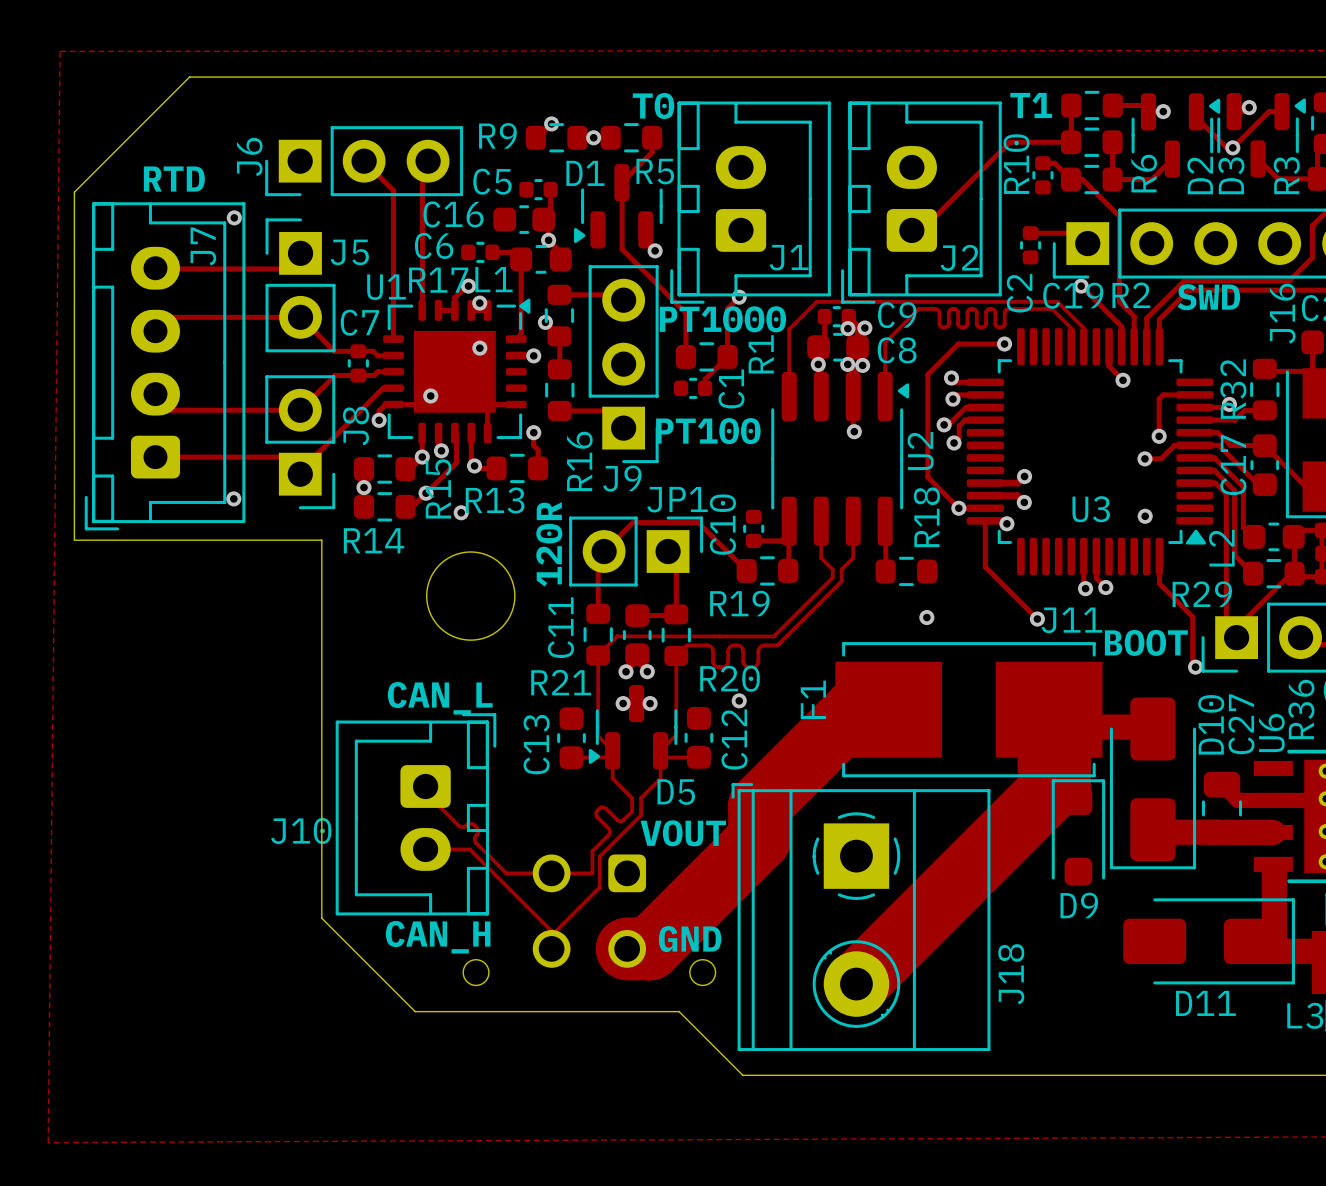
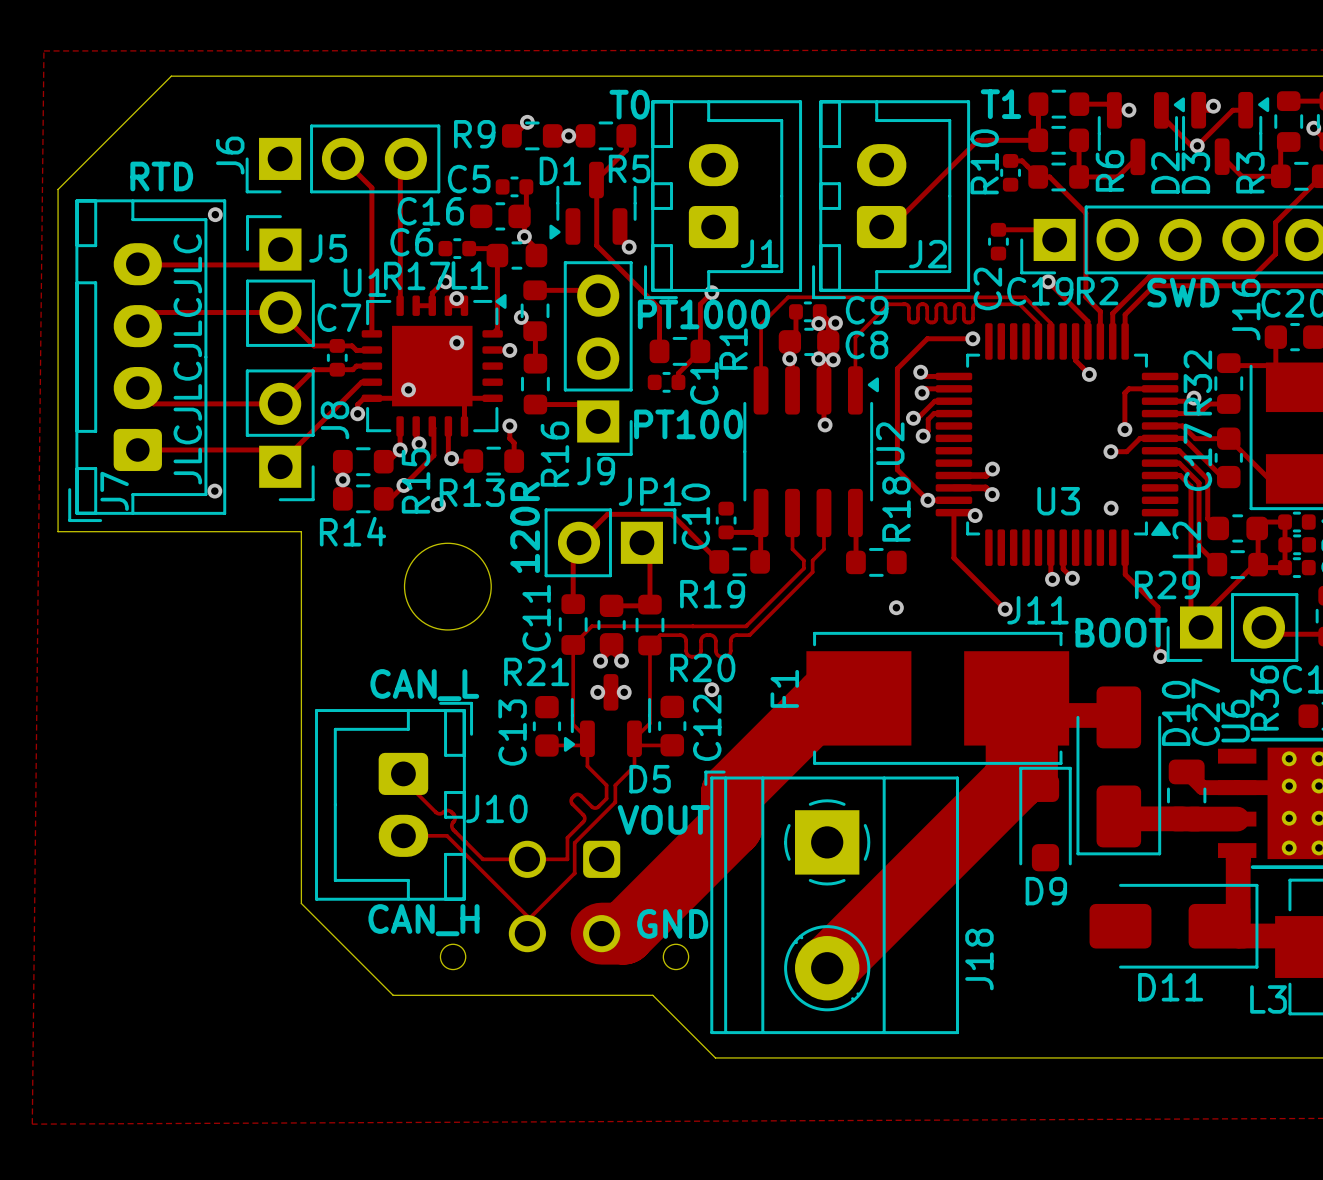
J7 name position: J7 (203, 246) -> J7 (114, 491)
text: none -> JLCJLCJLCJLC (187, 359)
J10 name position: J10 (301, 830) -> J10 (496, 808)

